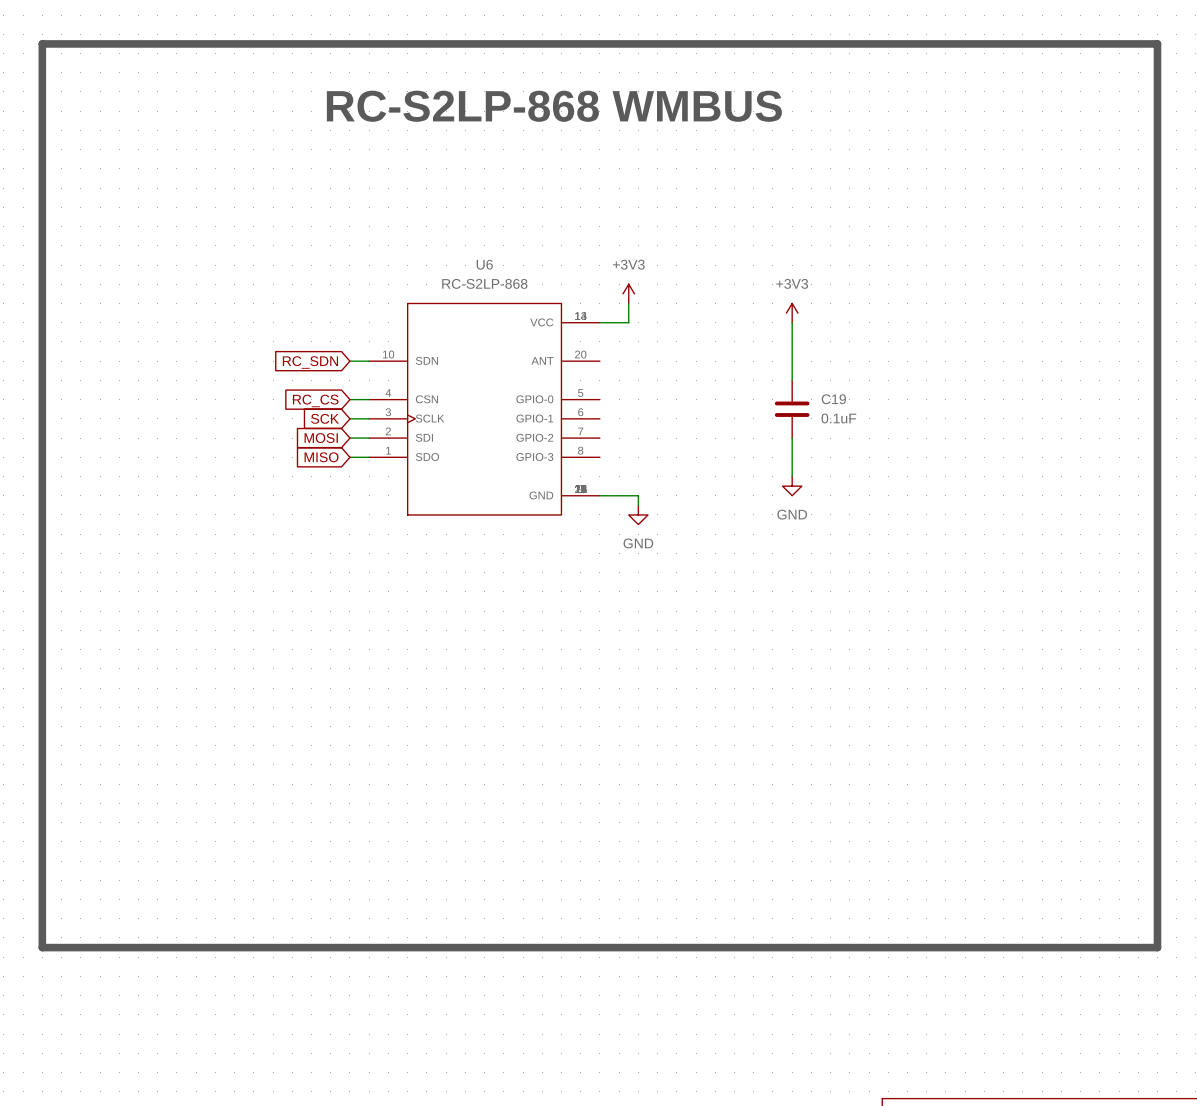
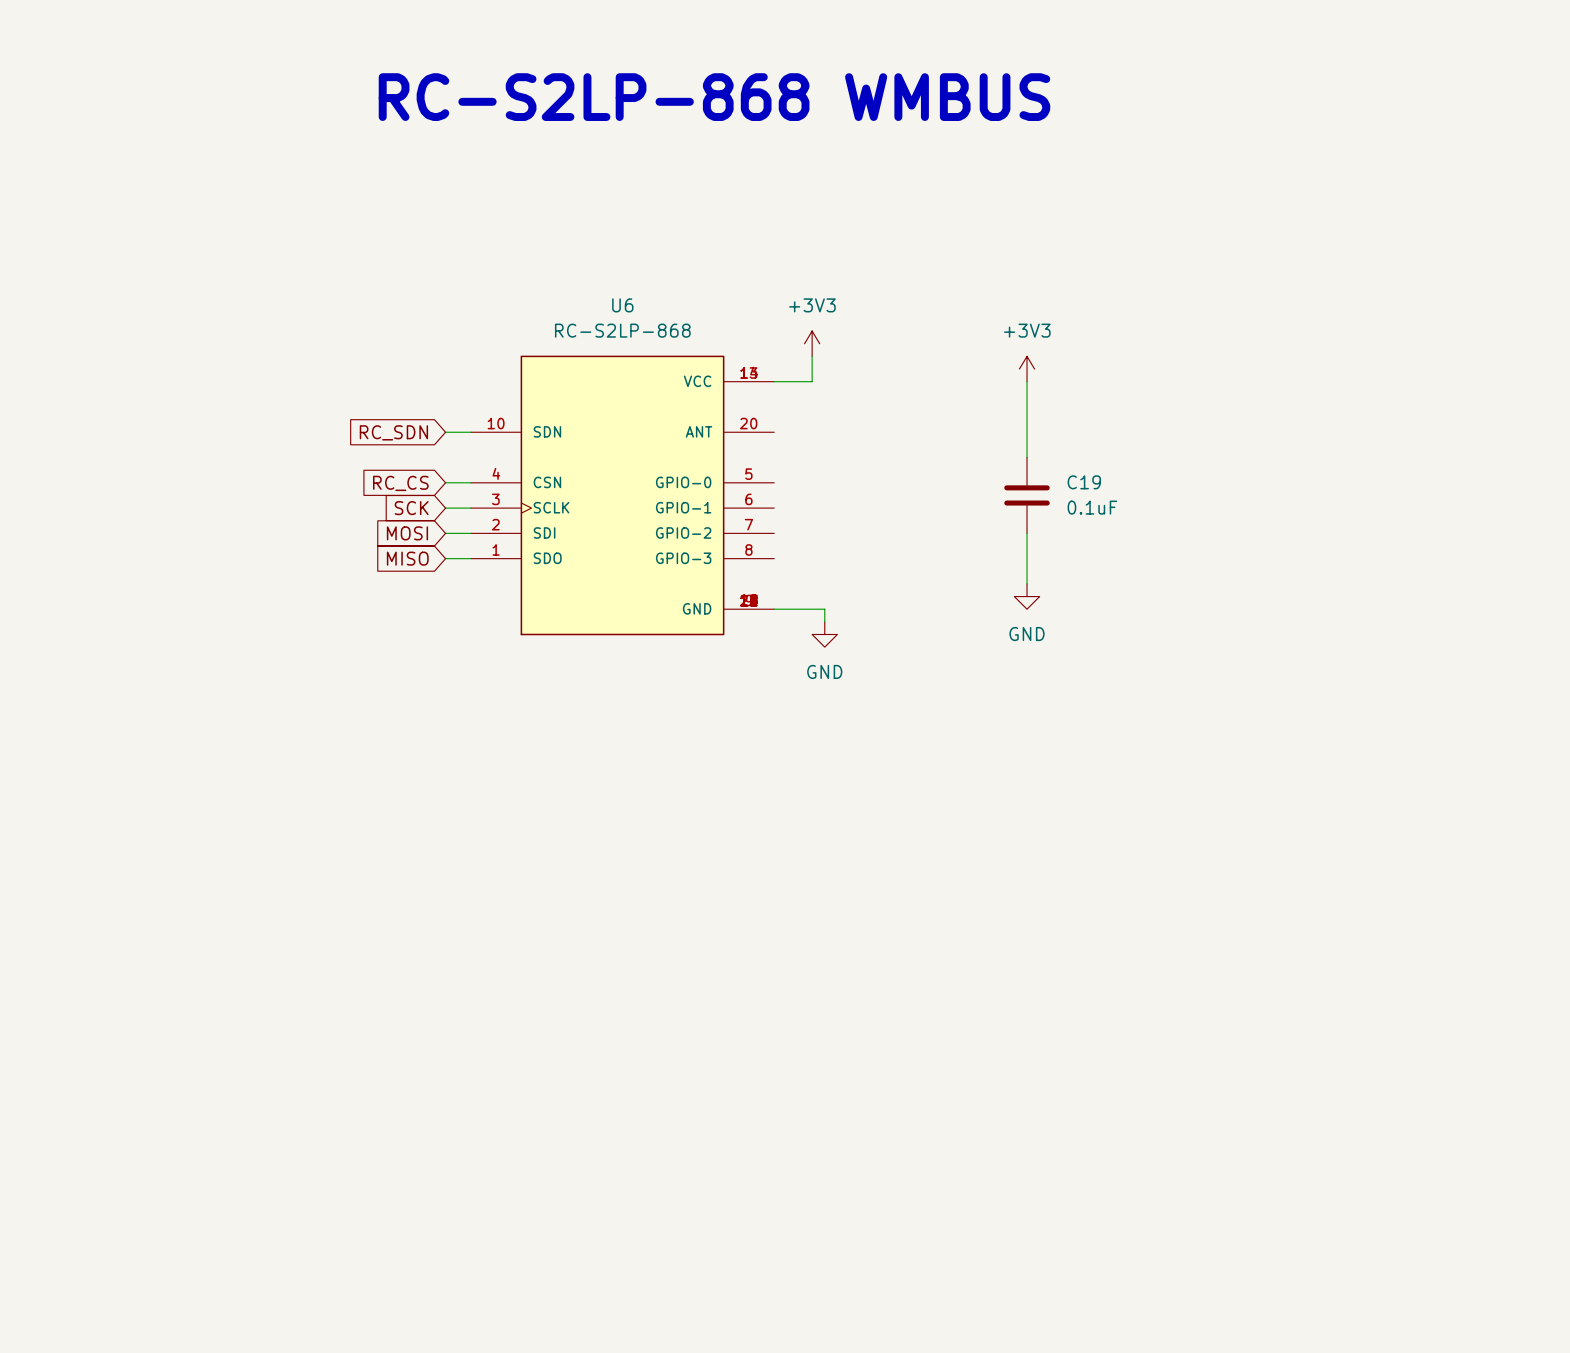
line: (42, 43) (1157, 43) (1157, 947) (42, 947) (42, 43) -> none

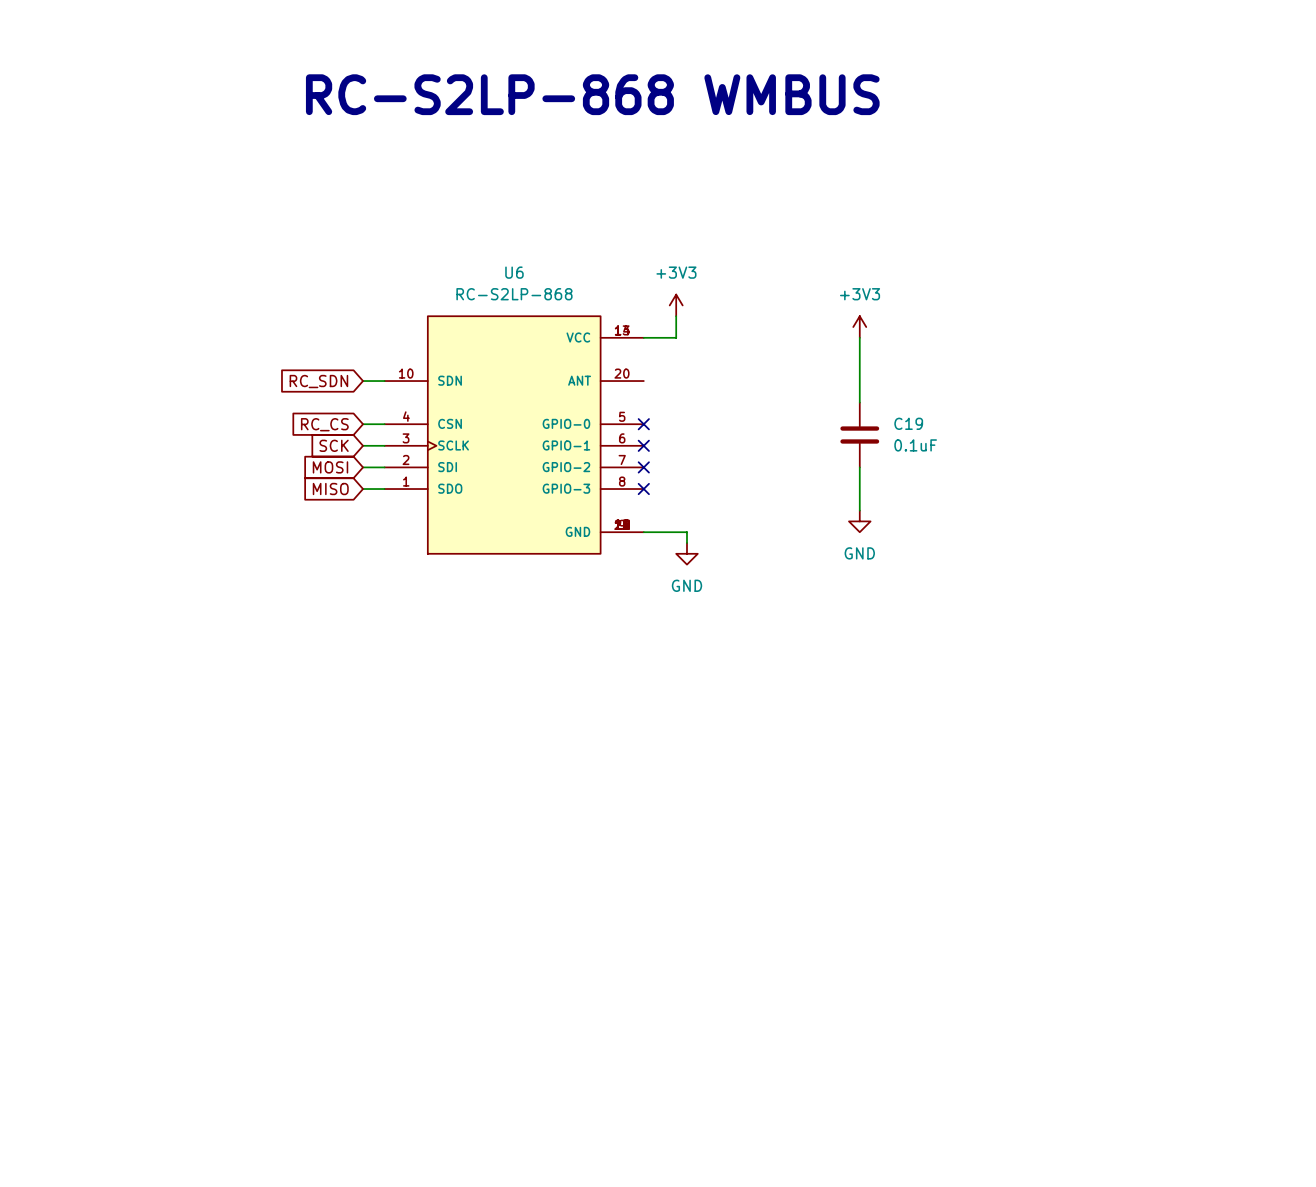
no-connect mark: none -> (643, 424)
no-connect mark: none -> (643, 445)
no-connect mark: none -> (643, 467)
no-connect mark: none -> (643, 489)

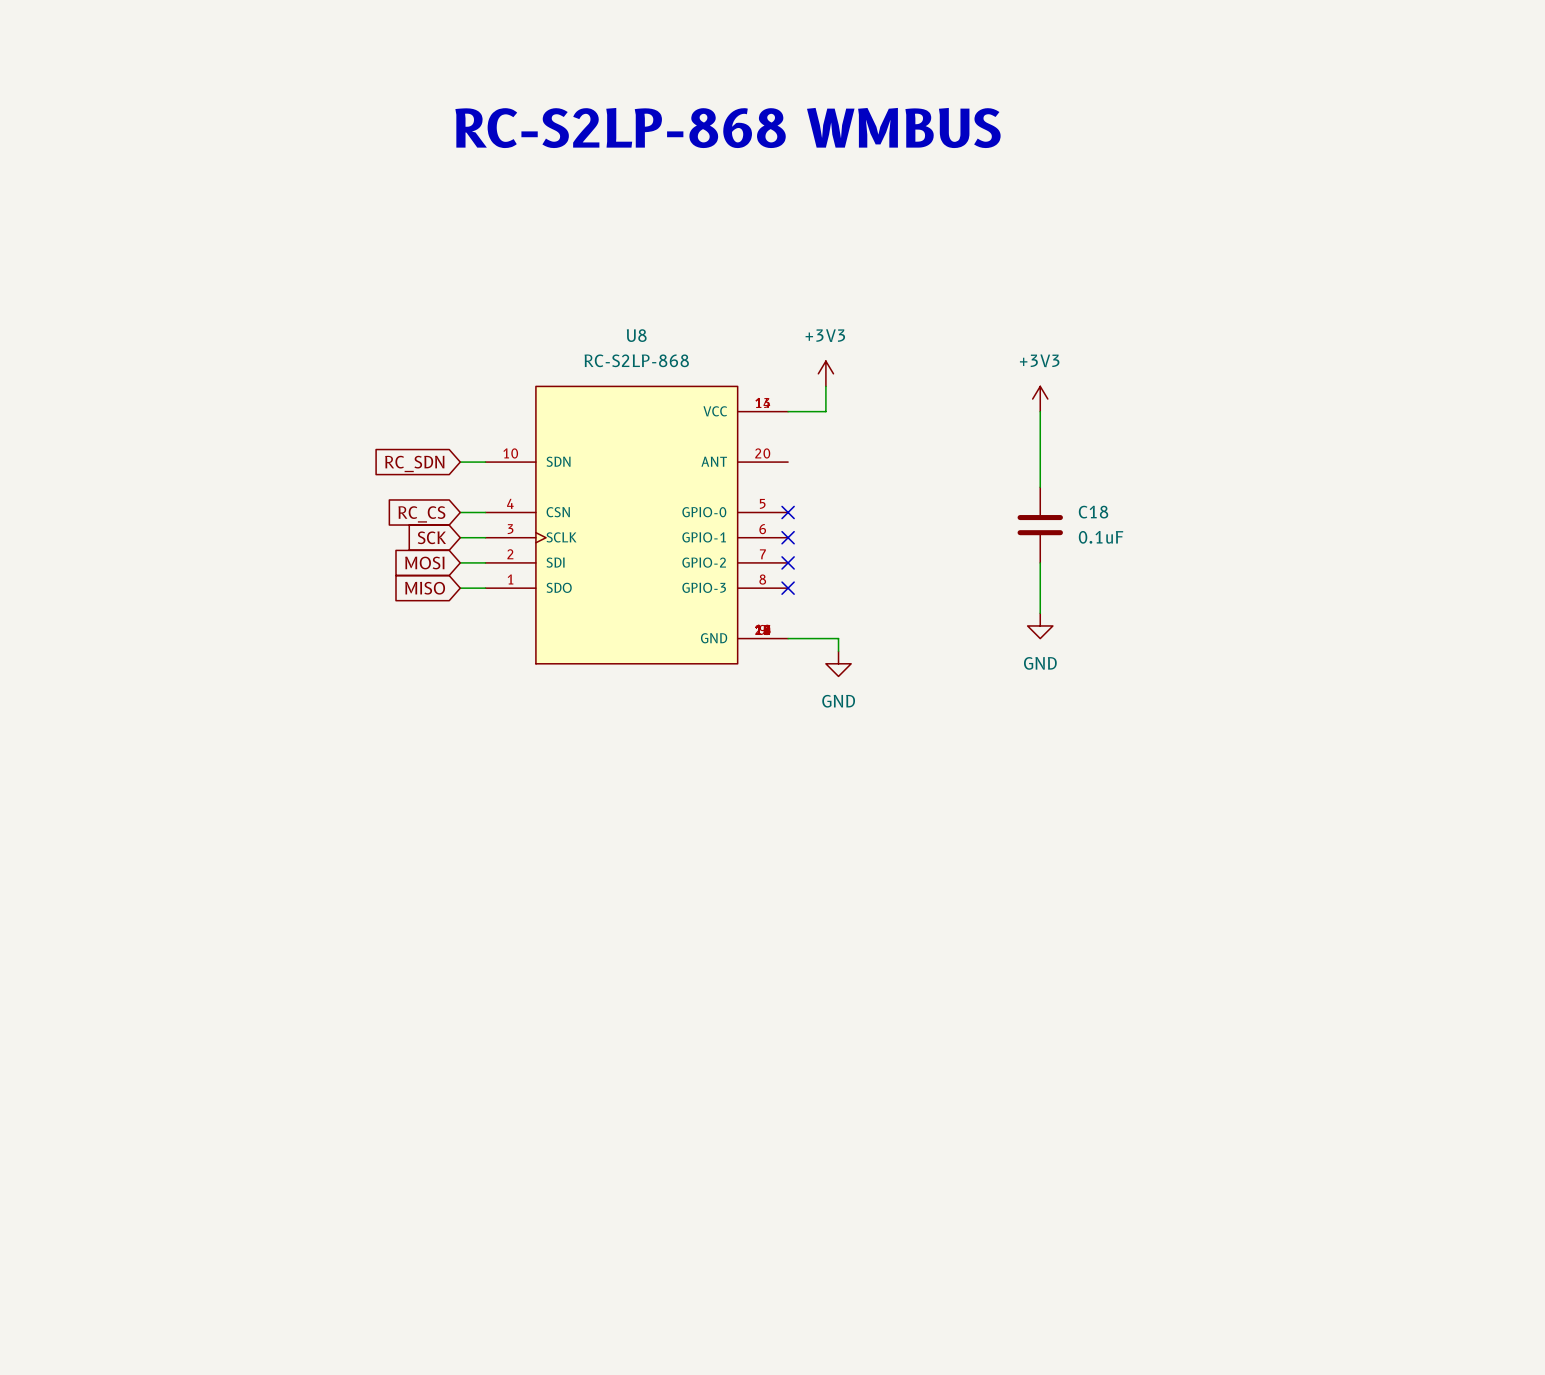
U6 name: U6 (514, 272) -> U8 (636, 335)
C19 name: C19 (908, 423) -> C18 (1093, 512)

